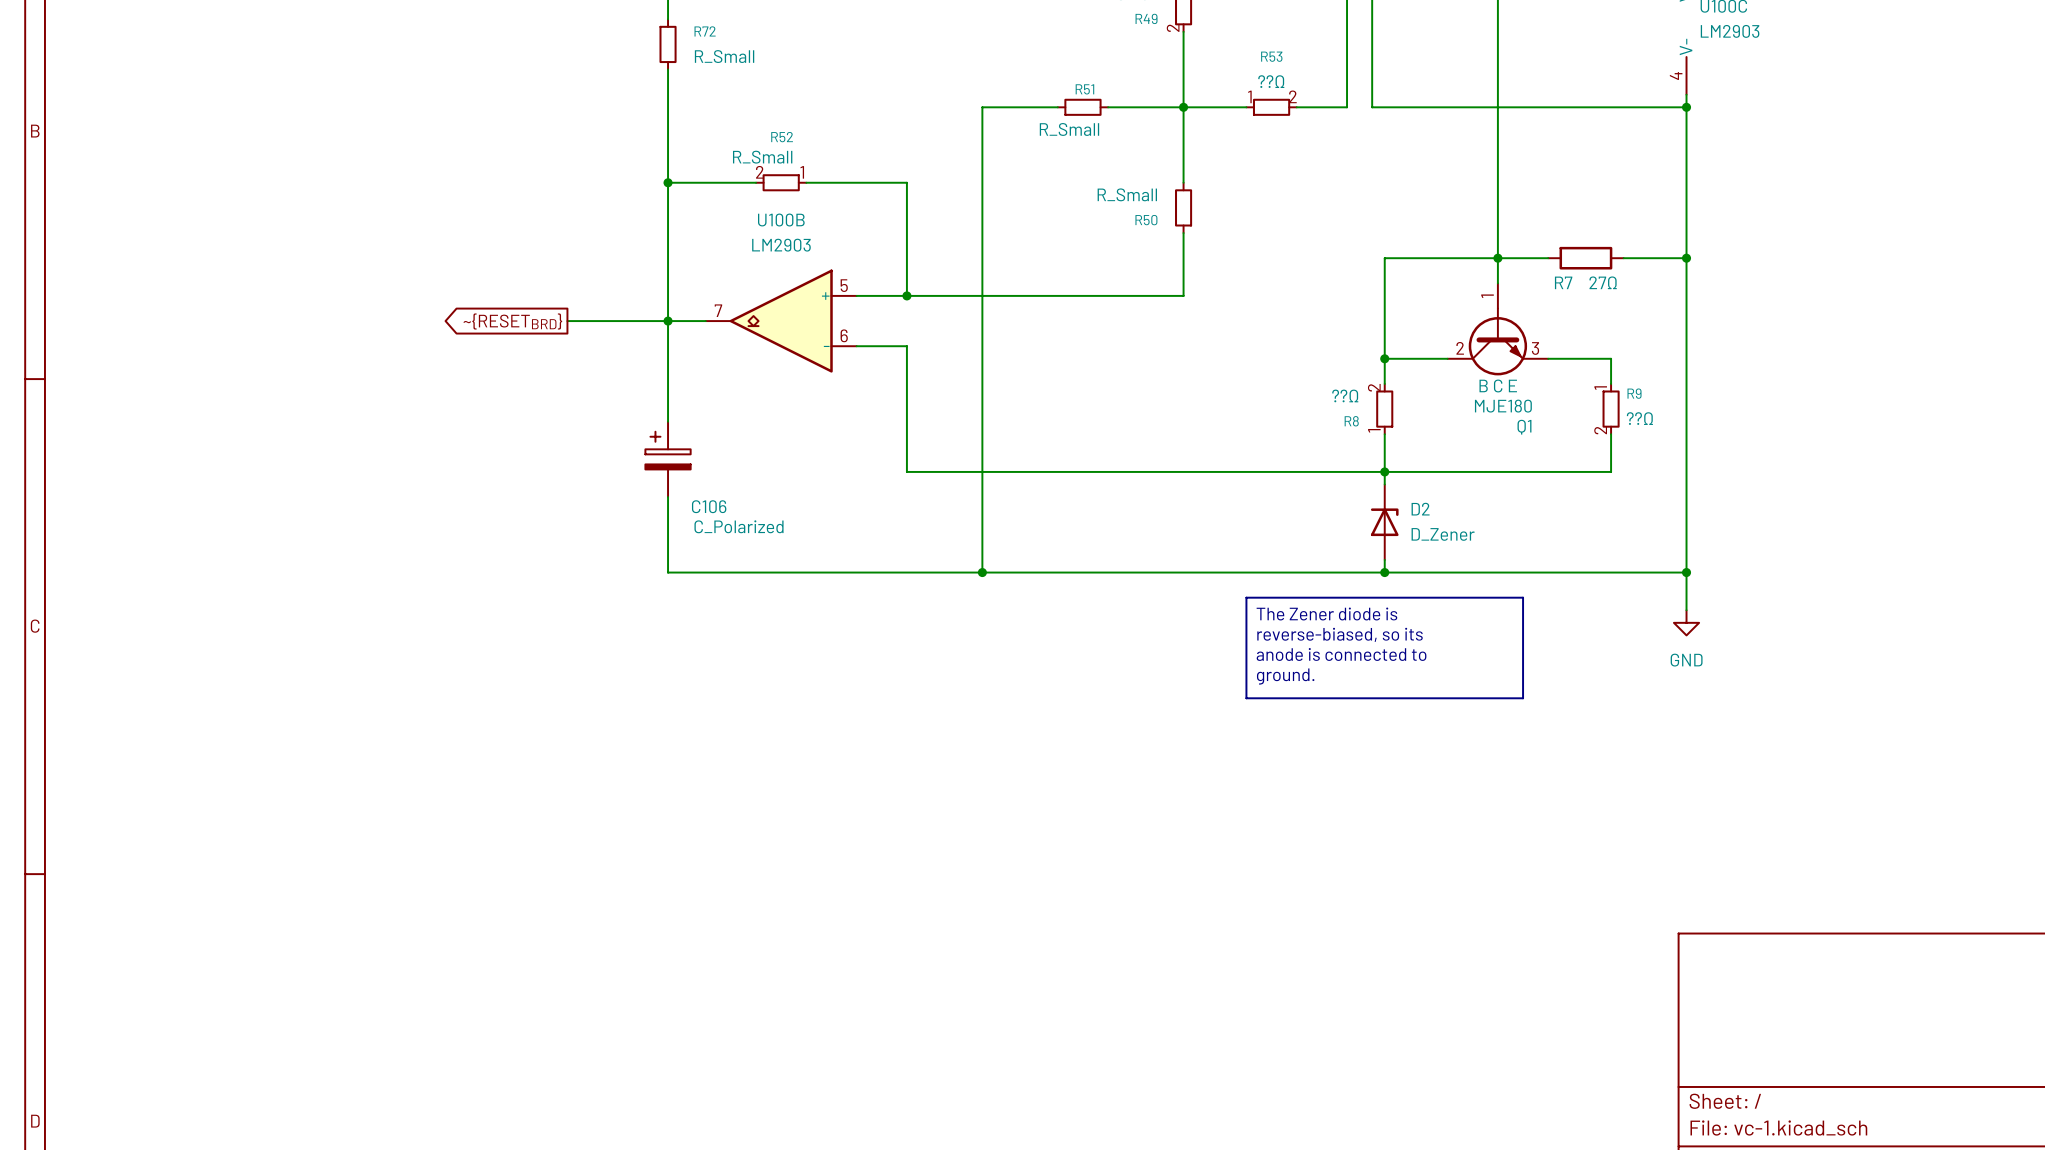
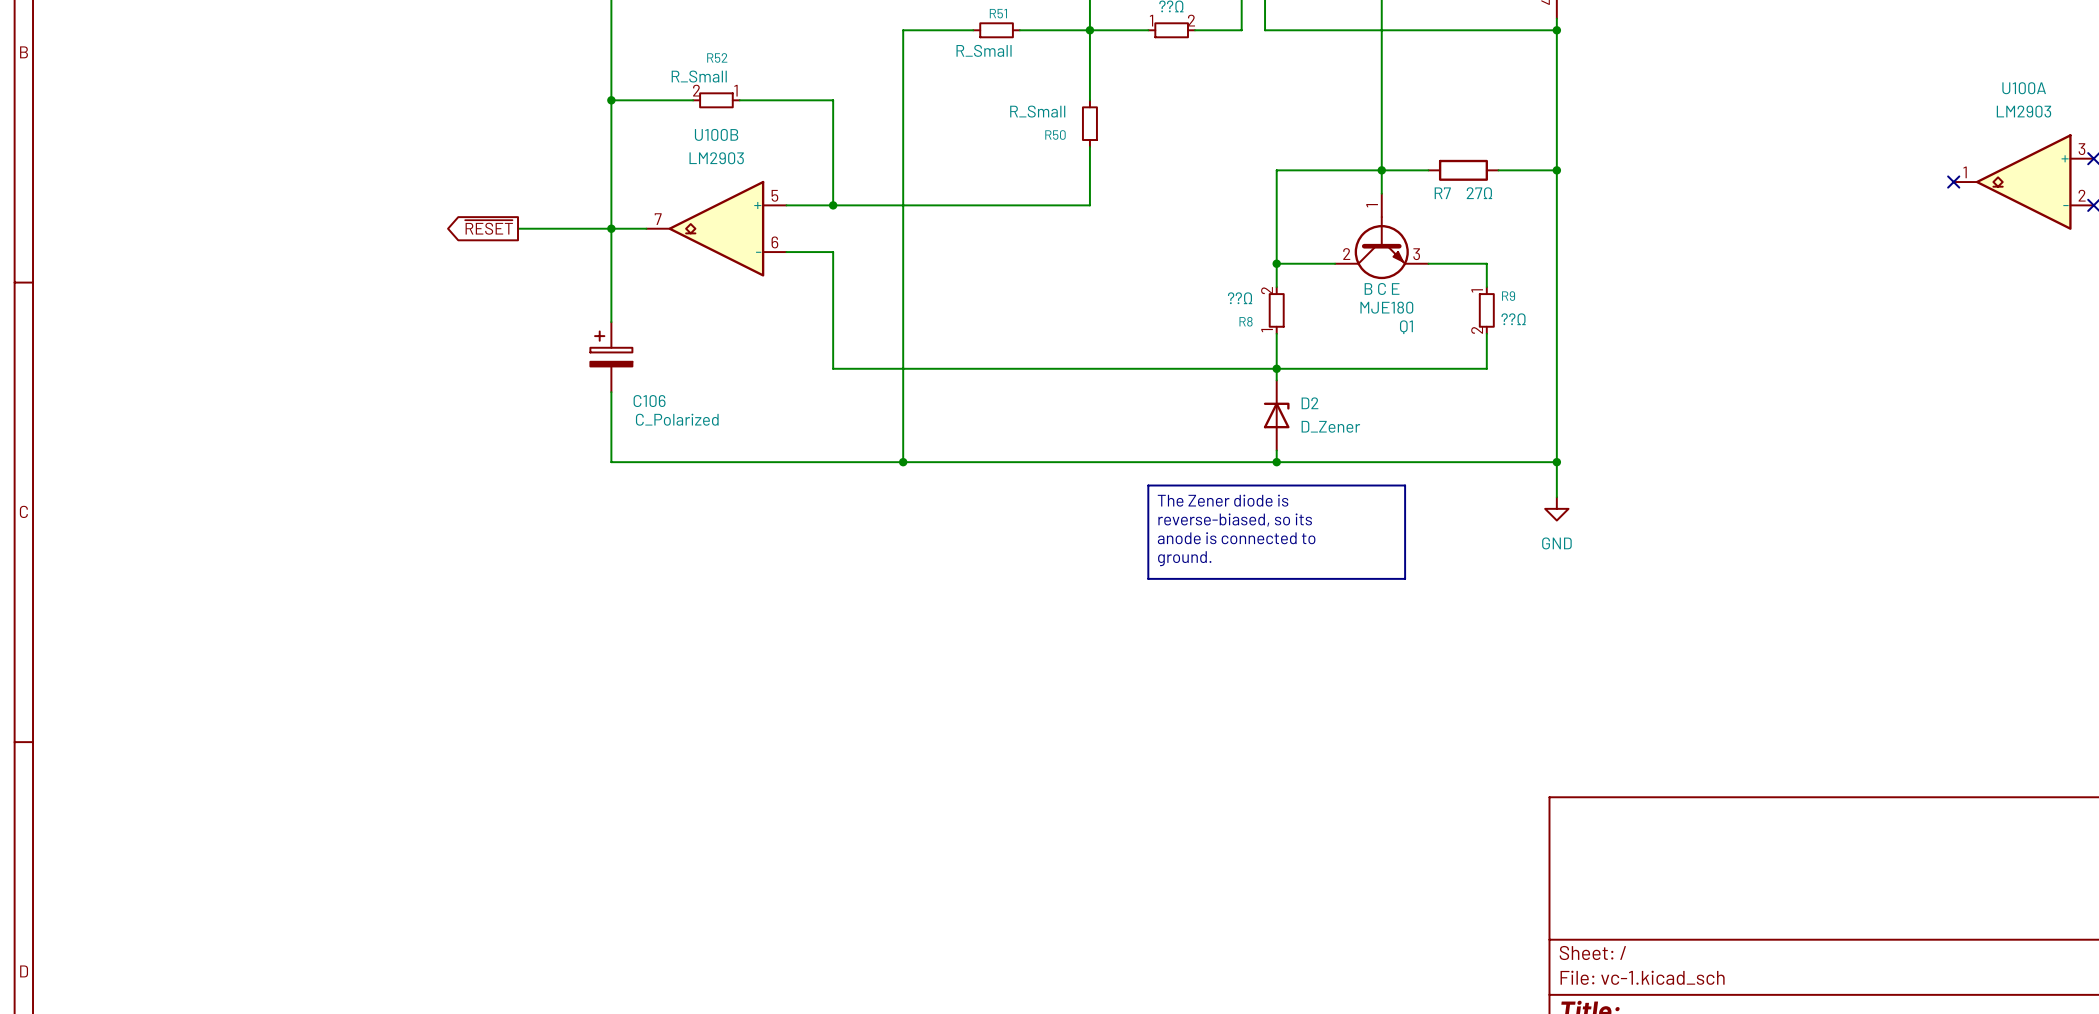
global label: ~{RESETBRD} (512, 321) -> ~{RESET} (489, 227)

